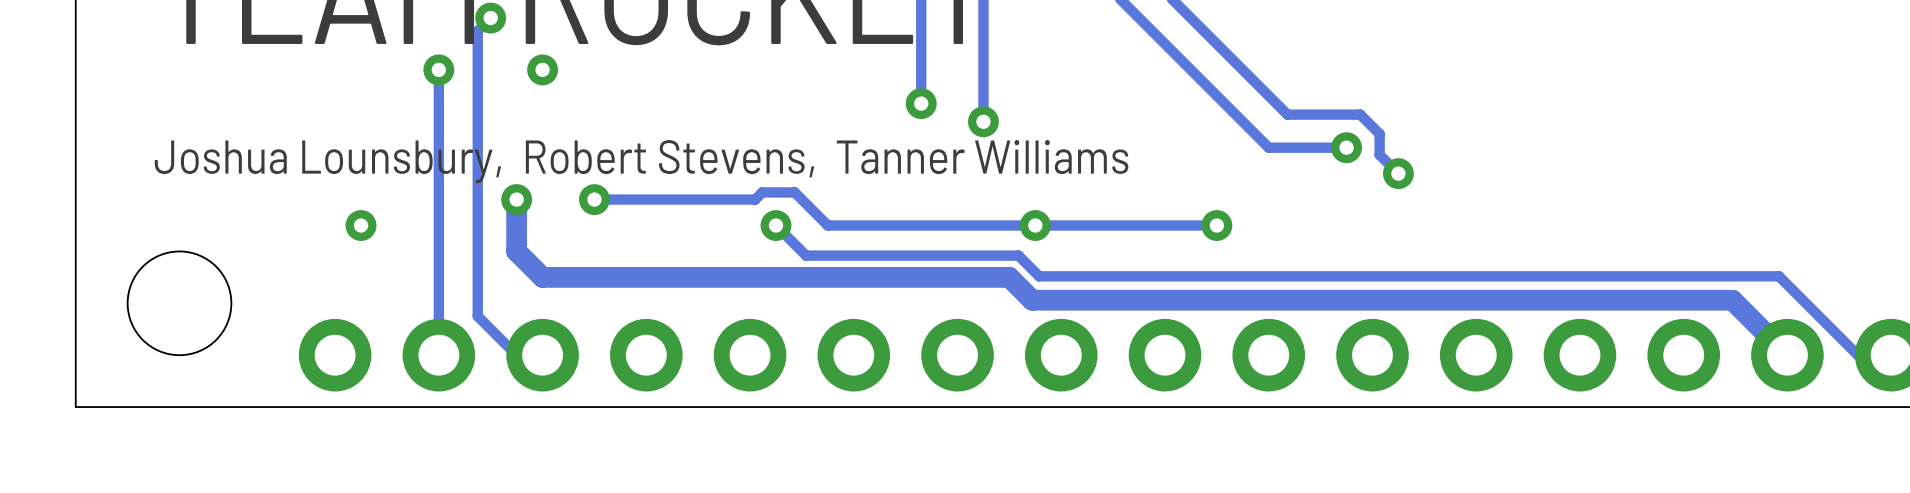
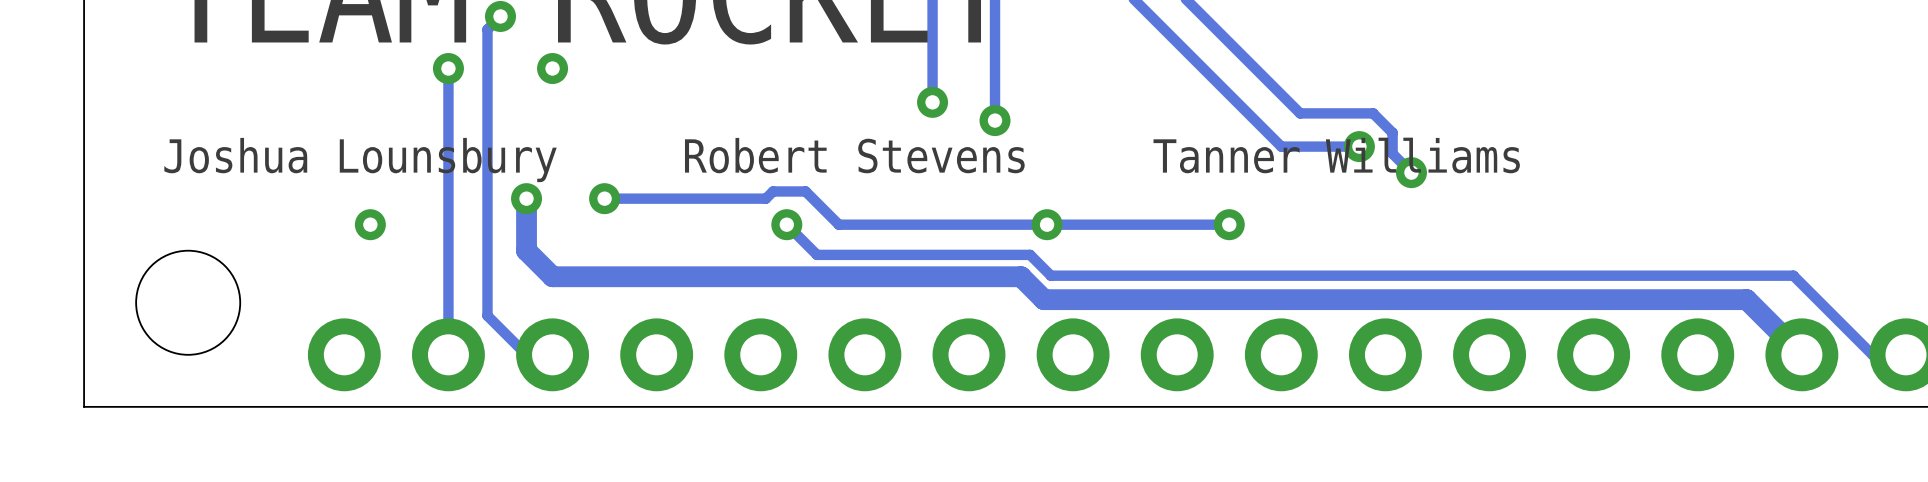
text: Joshua Lounsbury, Robert Stevens, Tanner Williams (641, 161) -> Joshua Lounsbury Robert Stevens Tanner Williams (842, 159)

